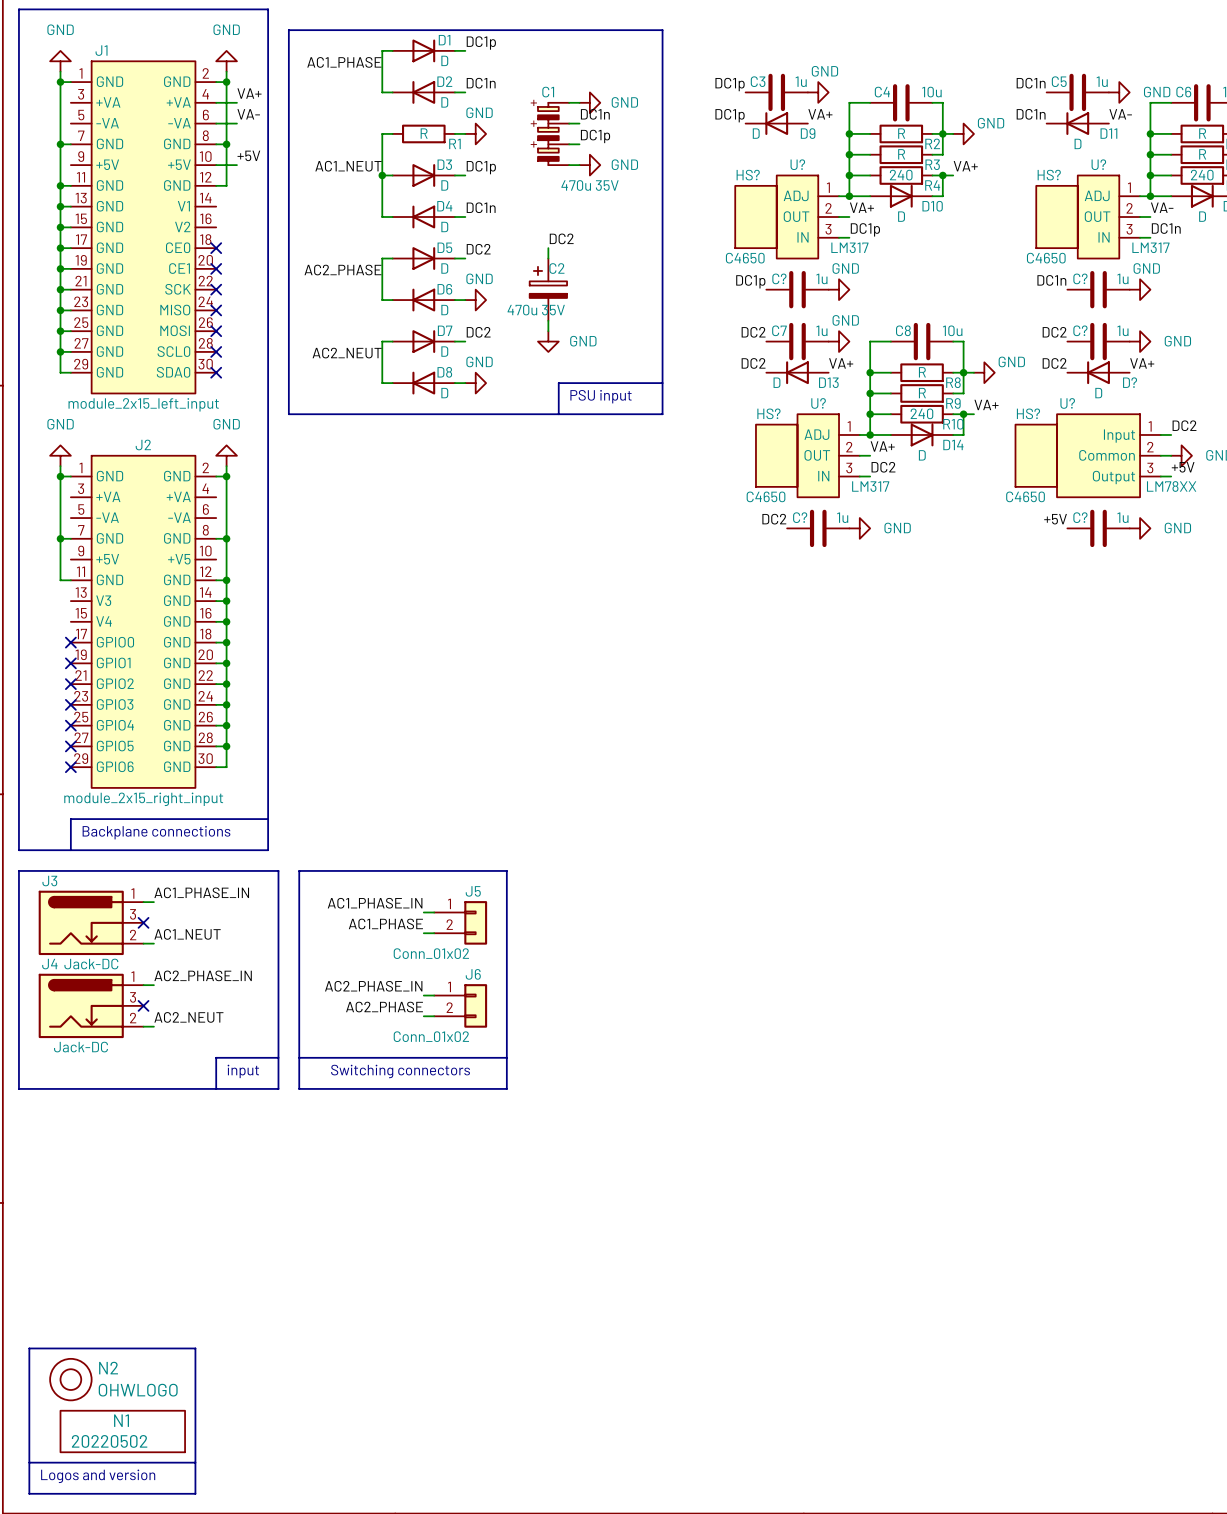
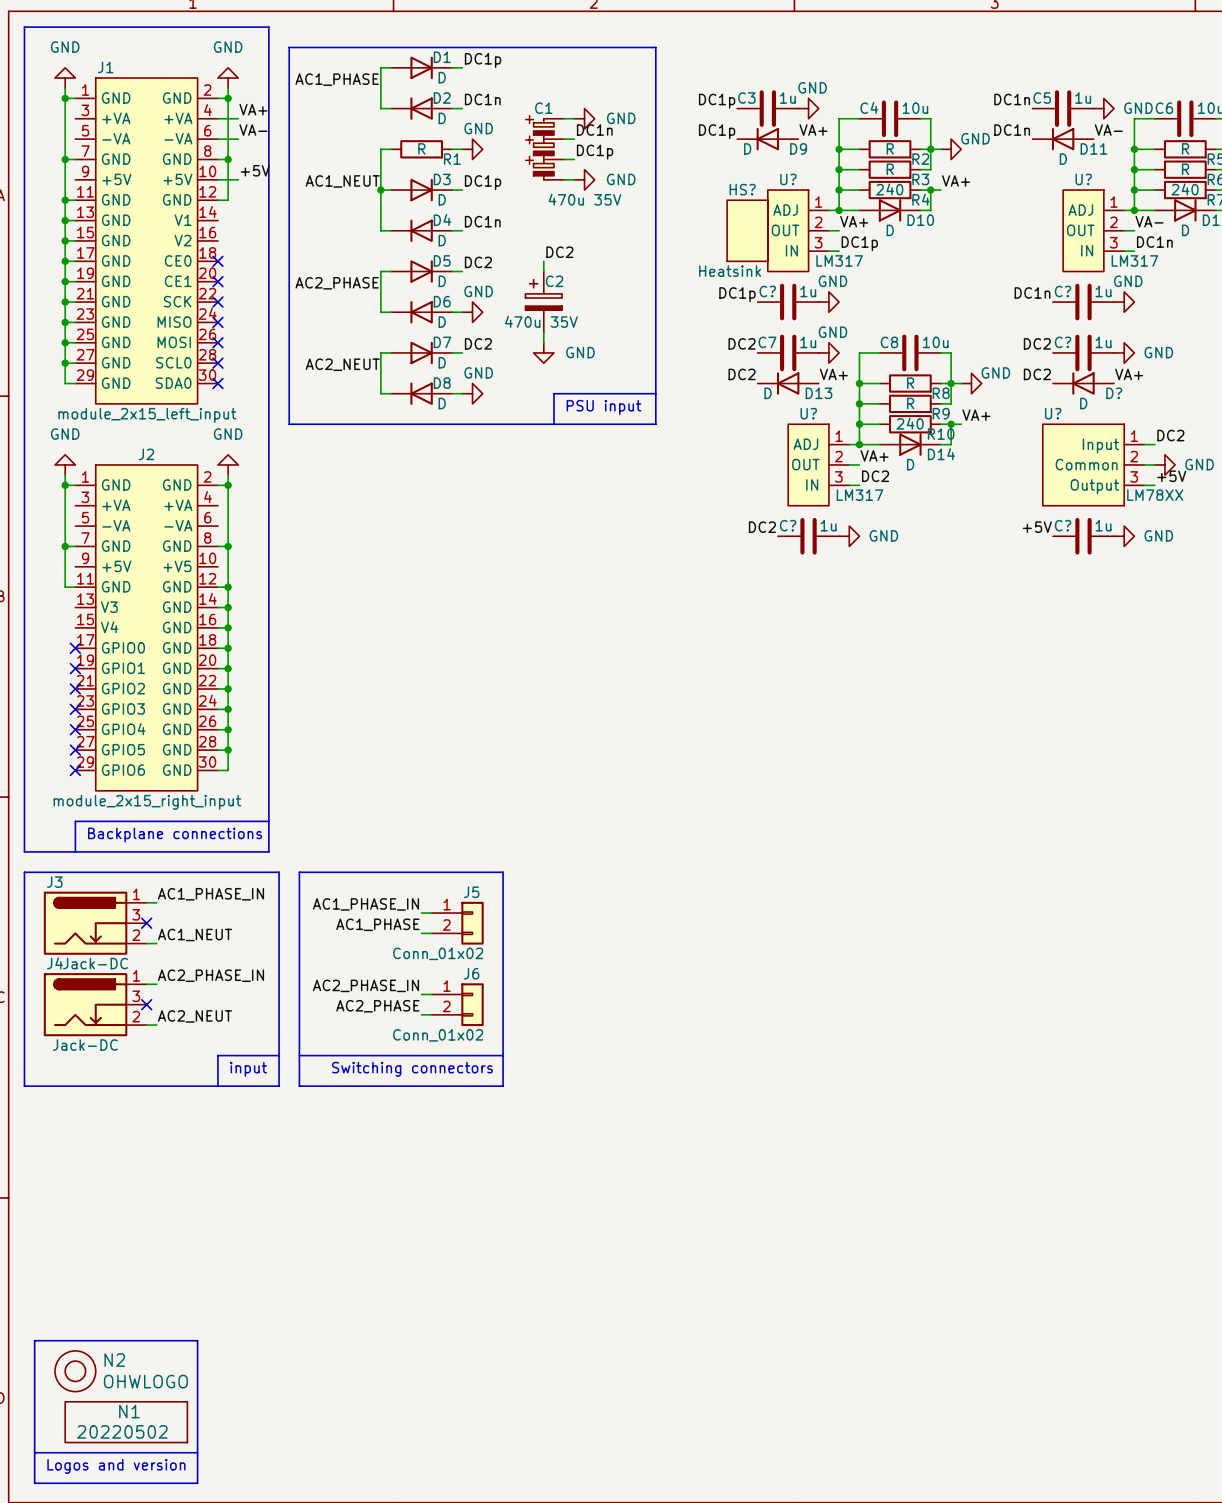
HS?: C4650 (1057, 217) -> none
HS? value: C4650 (745, 258) -> Heatsink (730, 271)
HS?: C4650 (776, 455) -> none
HS?: C4650 (1036, 455) -> none

